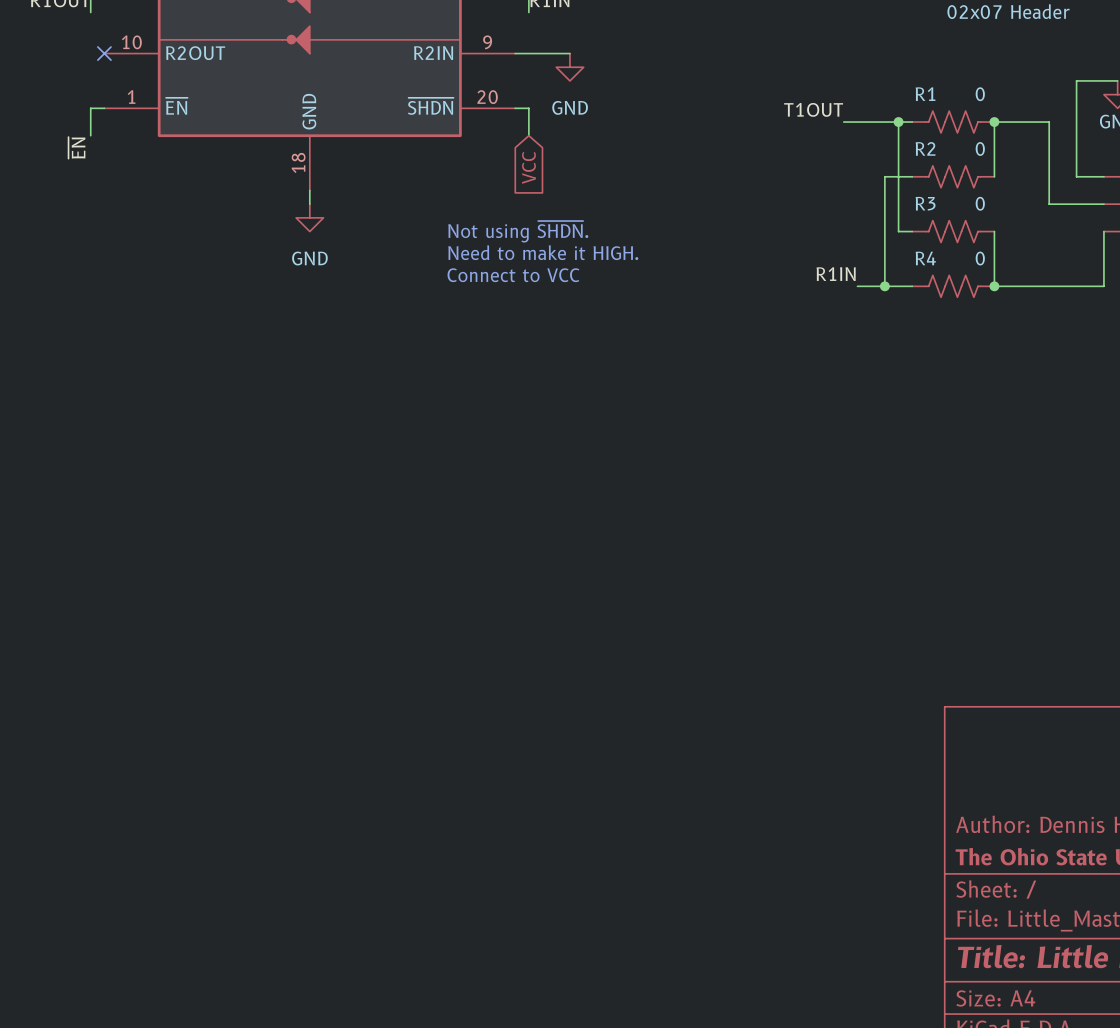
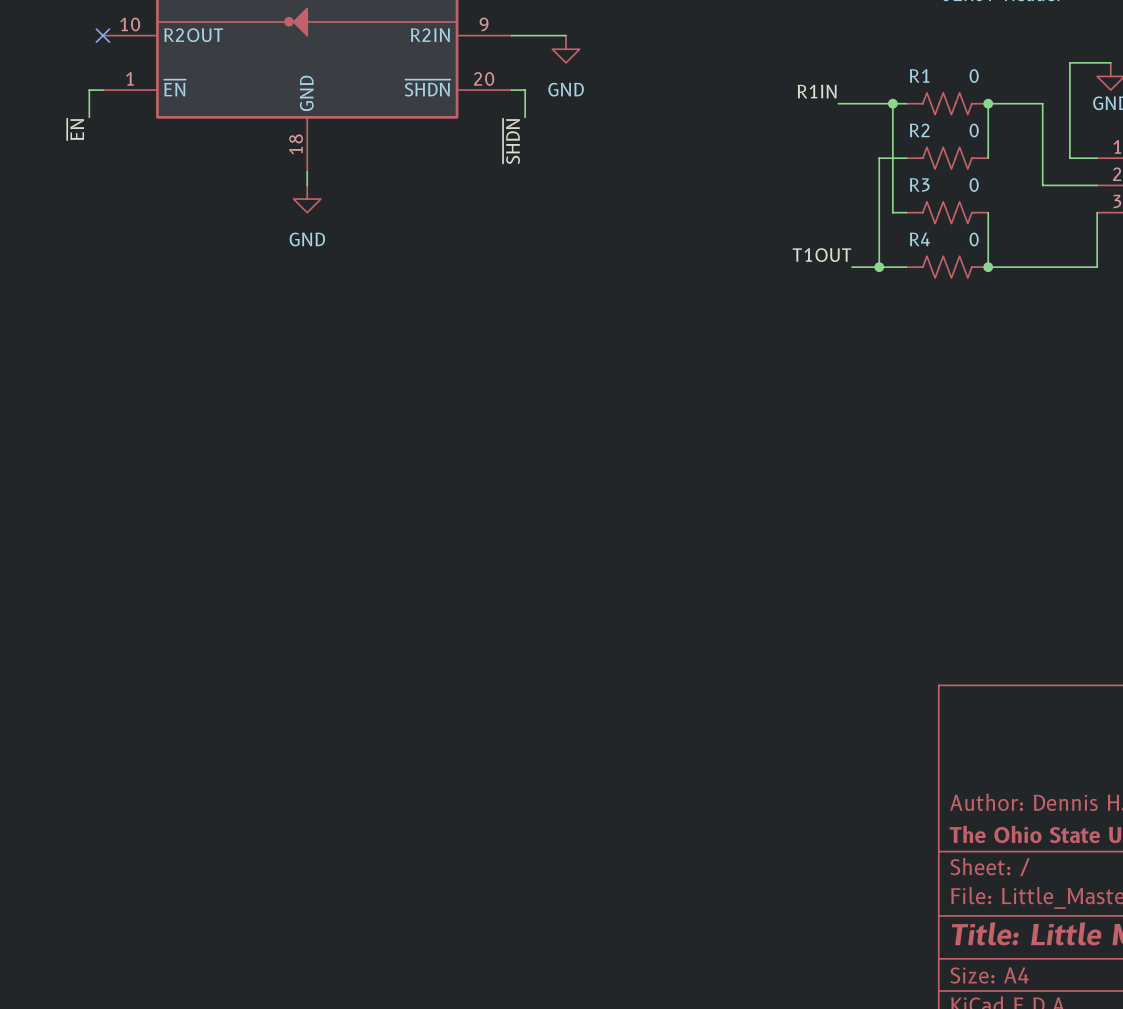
label: T1OUT (813, 109) -> R1IN (817, 91)
label: none -> ~{SHDN} (511, 141)
global label: VCC (528, 167) -> none
text: Not using ~{SHDN}. (518, 231) -> none
text: Need to make it HIGH. (543, 252) -> none
label: R1IN (836, 274) -> T1OUT (821, 255)
text: Connect to VCC (513, 275) -> none

